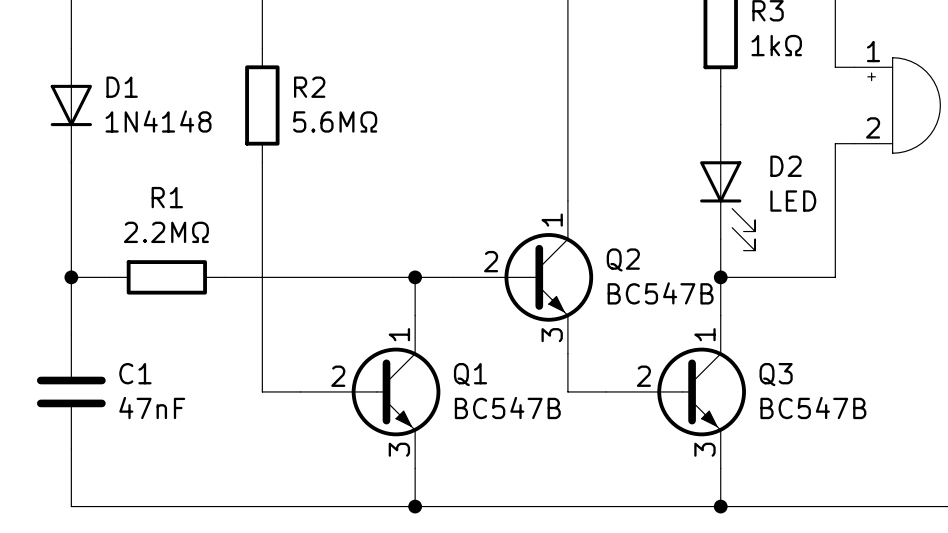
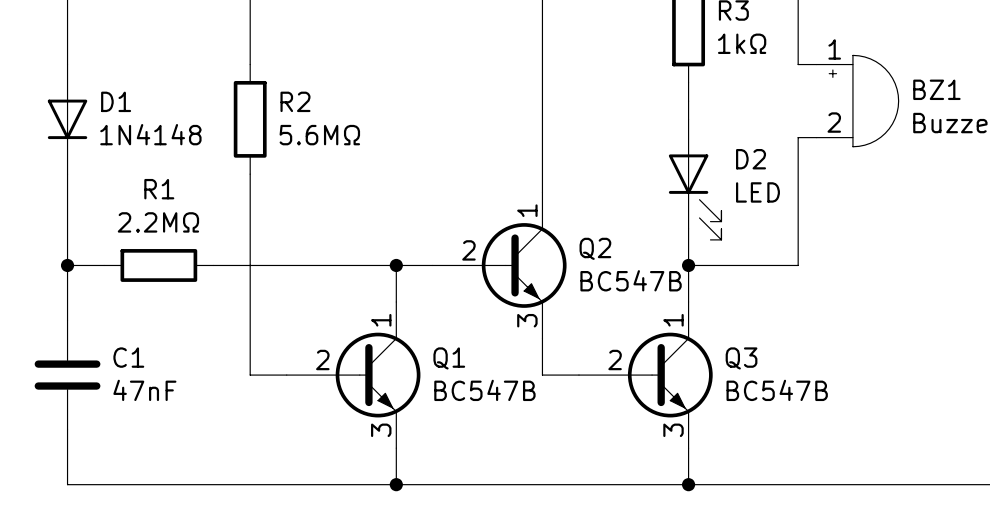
D1 position: (71, 105) -> (67, 119)
R2 position: (262, 105) -> (250, 119)

